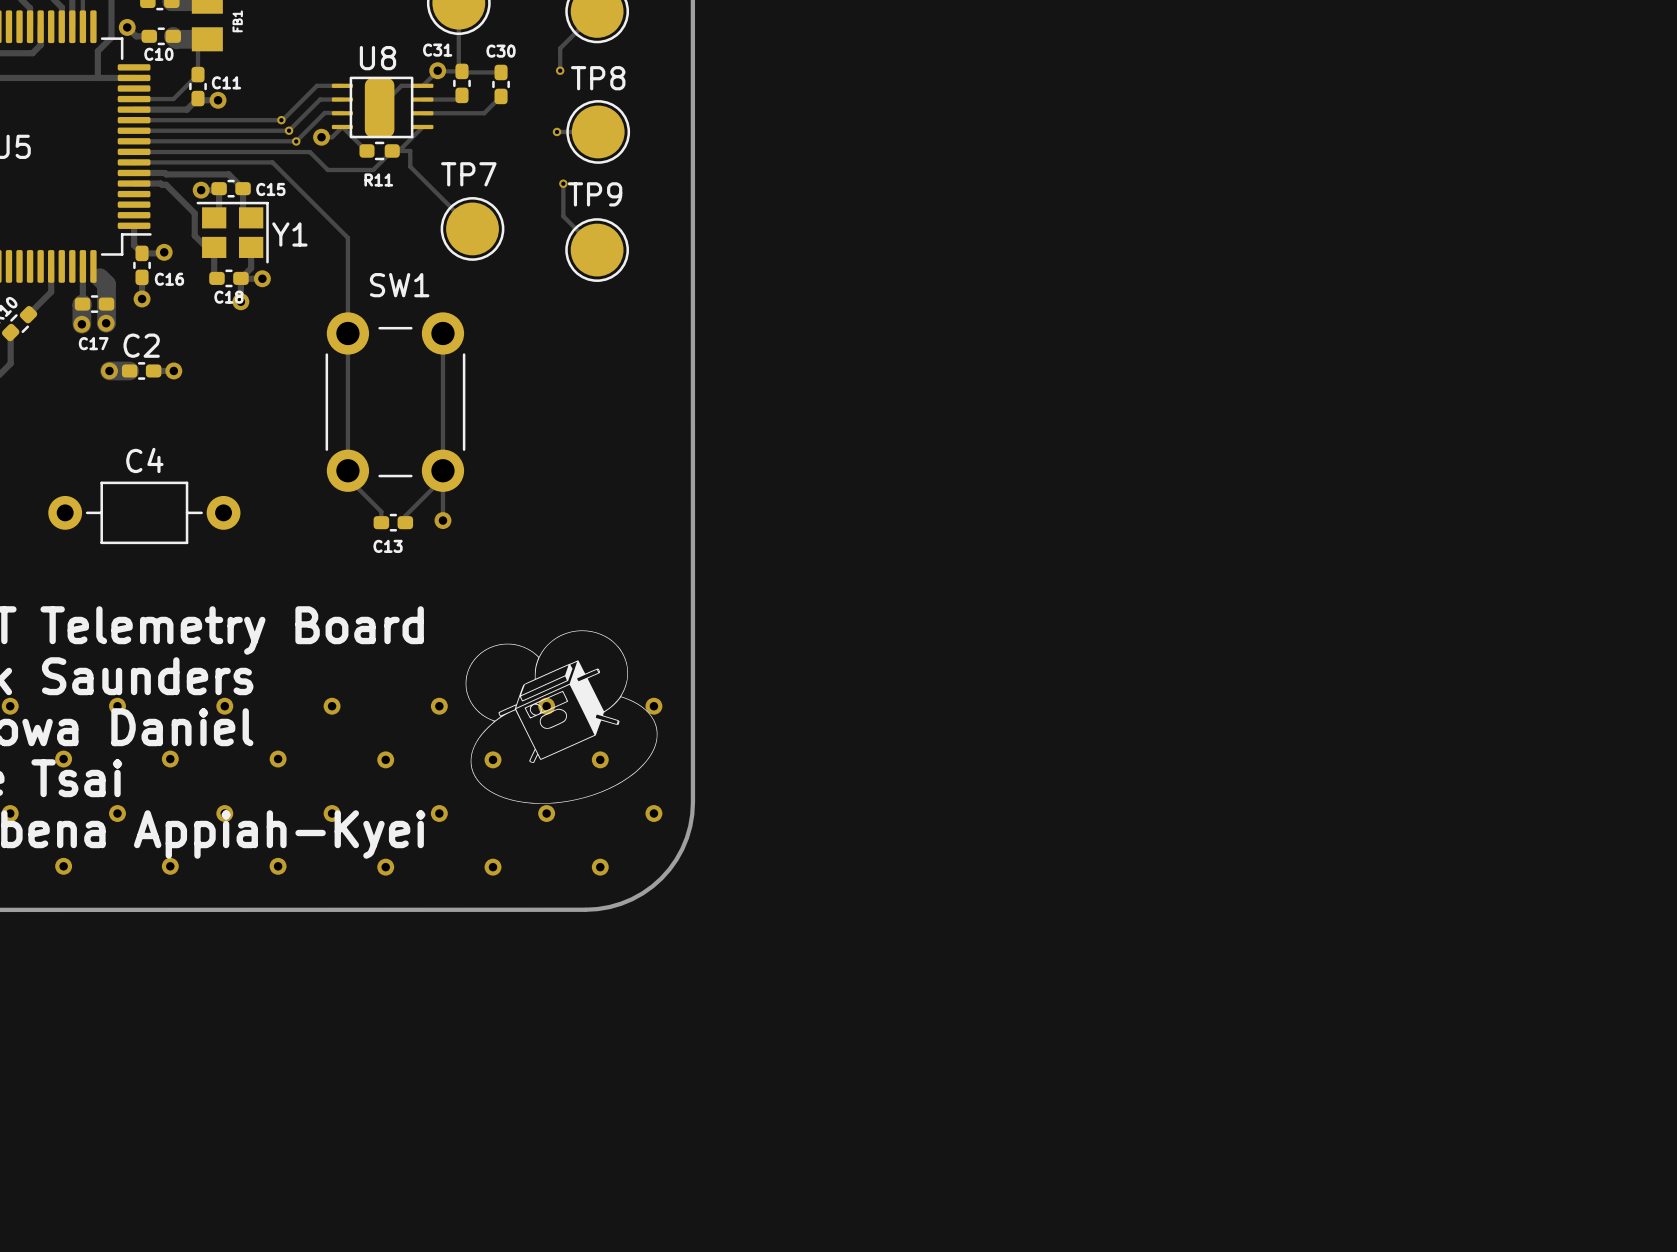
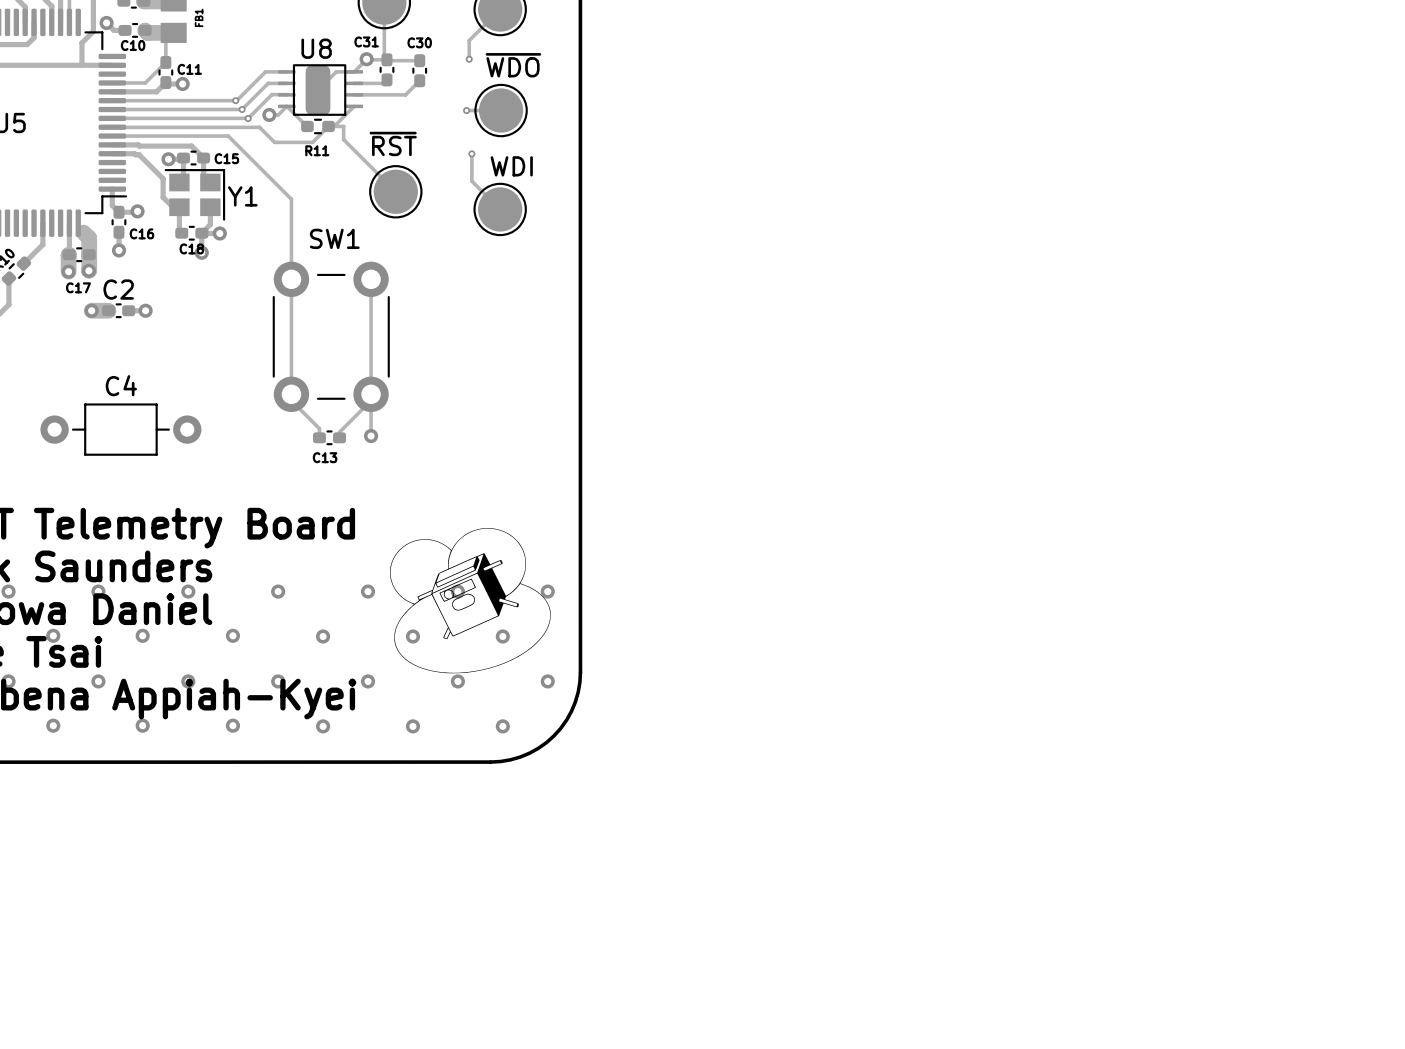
TP8 name: TP8 (598, 78) -> ~{WDO} (513, 65)
TP7 name: TP7 (468, 174) -> ~{RST} (393, 143)
TP9 name: TP9 (595, 194) -> WDI (511, 166)

